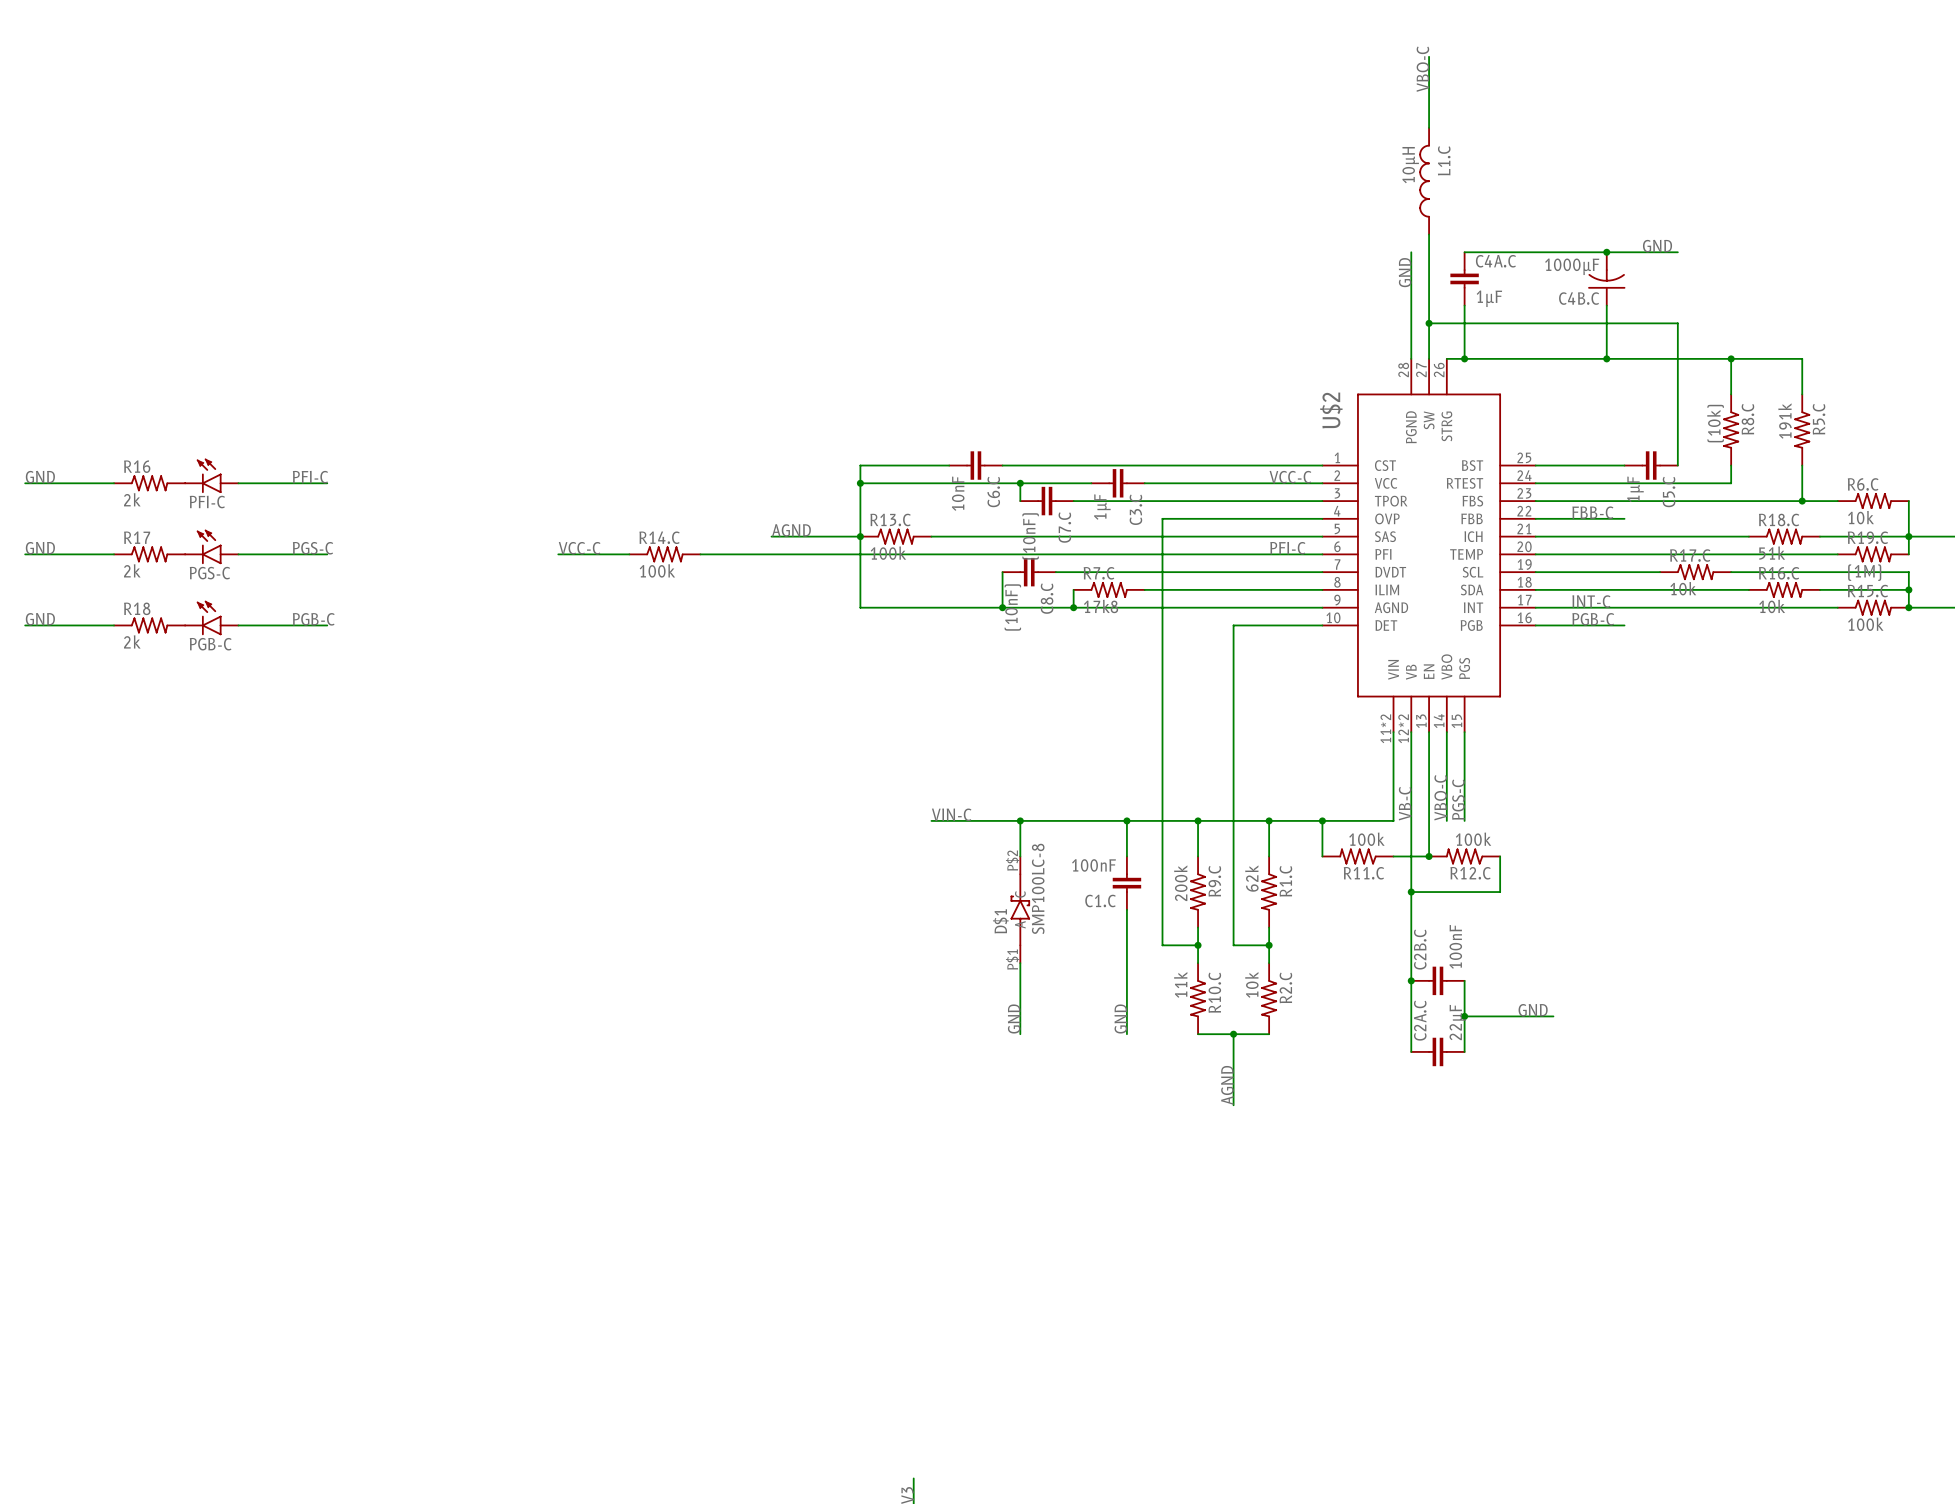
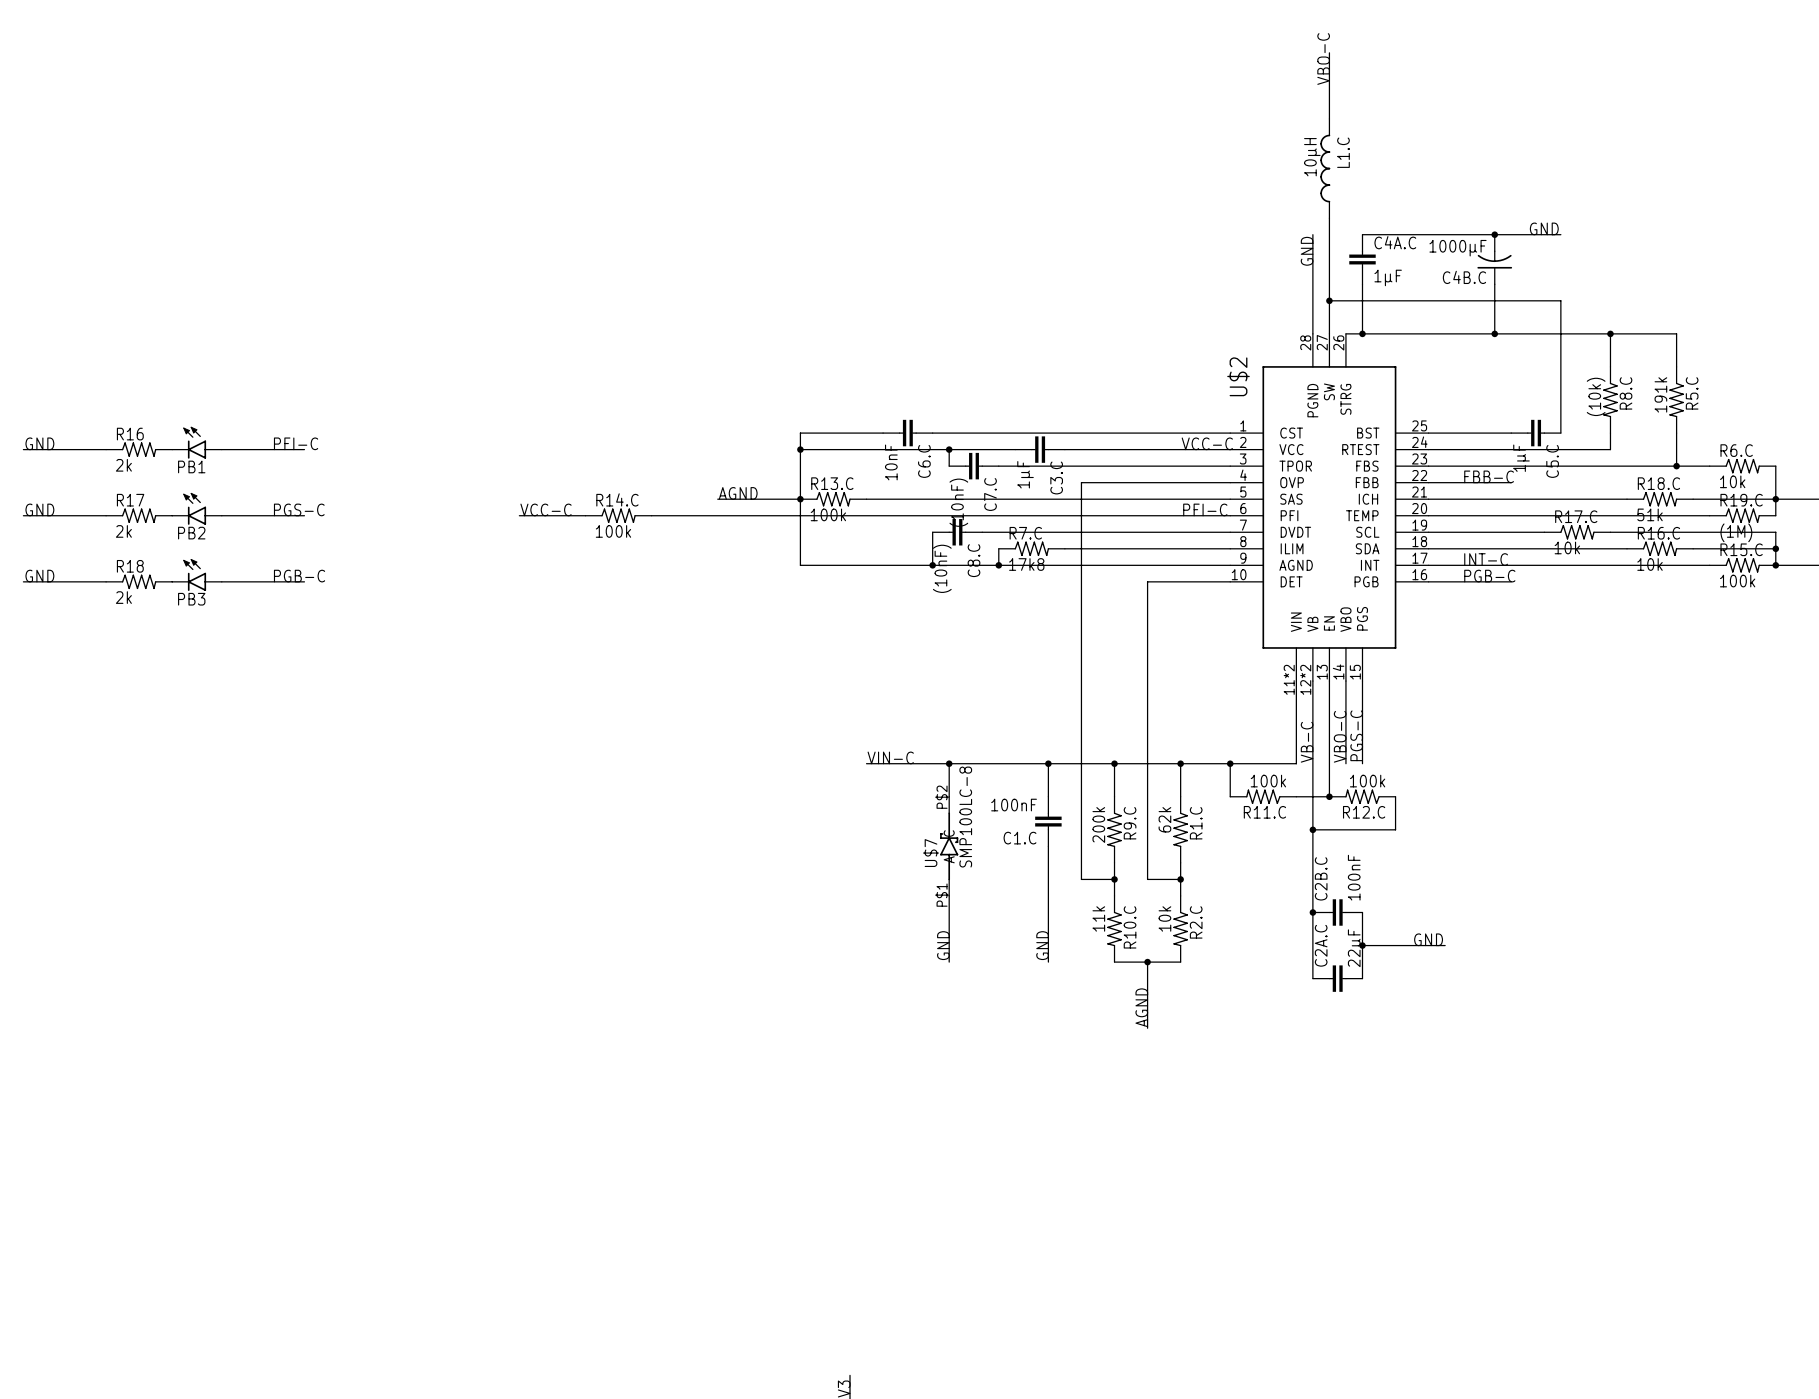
PFI-C name: PFI-C (207, 502) -> PB1 (191, 466)
PGS-C name: PGS-C (209, 573) -> PB2 (191, 533)
PGB-C name: PGB-C (210, 644) -> PB3 (191, 599)
D$1 name: D$1 (1000, 921) -> U$7 (931, 853)

